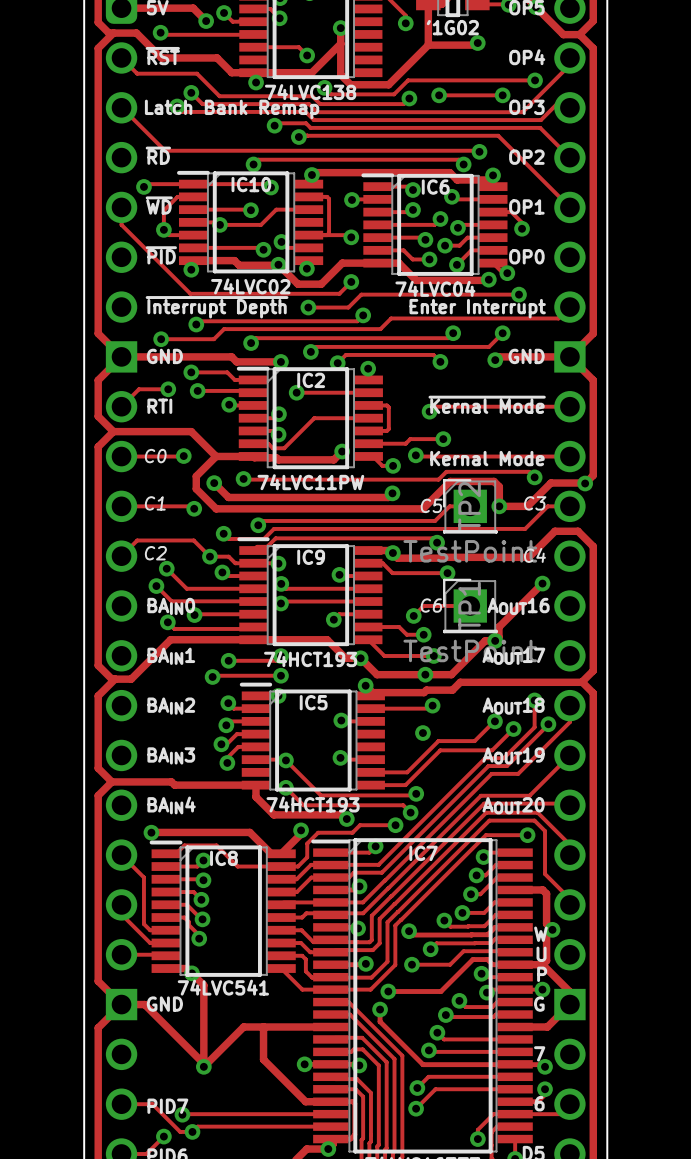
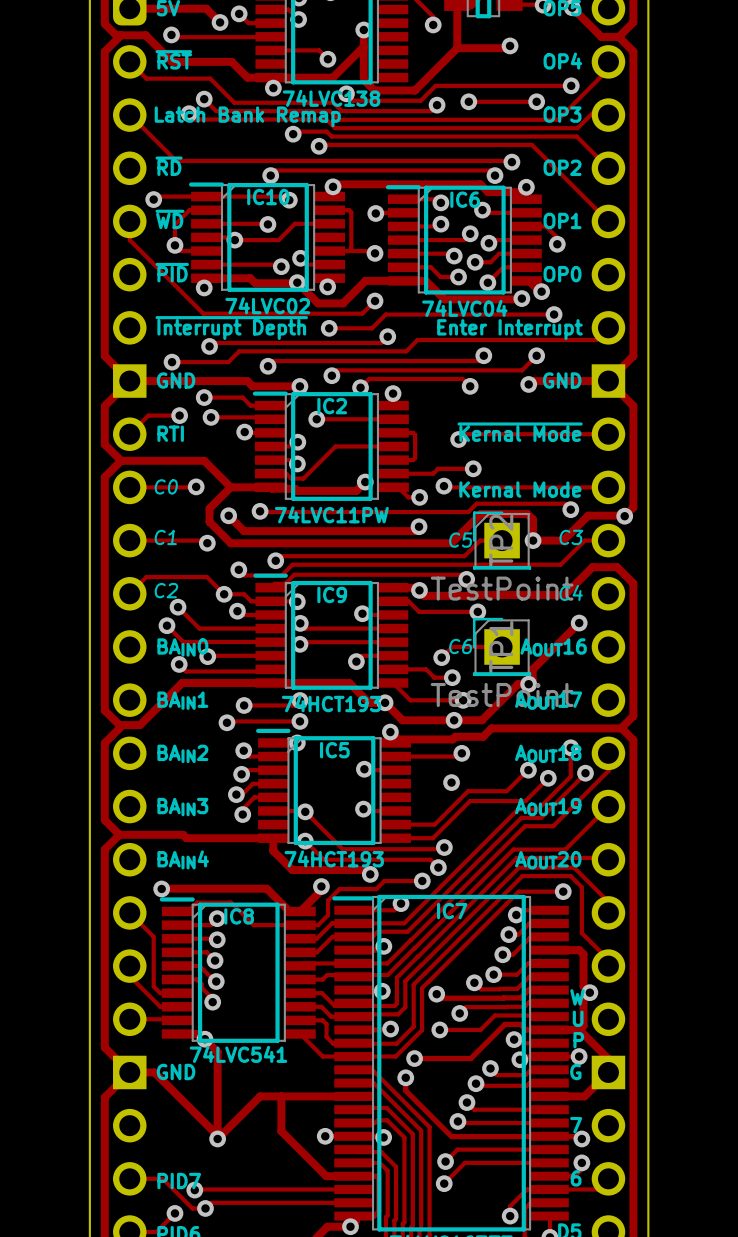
part text: '1G02 (452, 27) -> none

